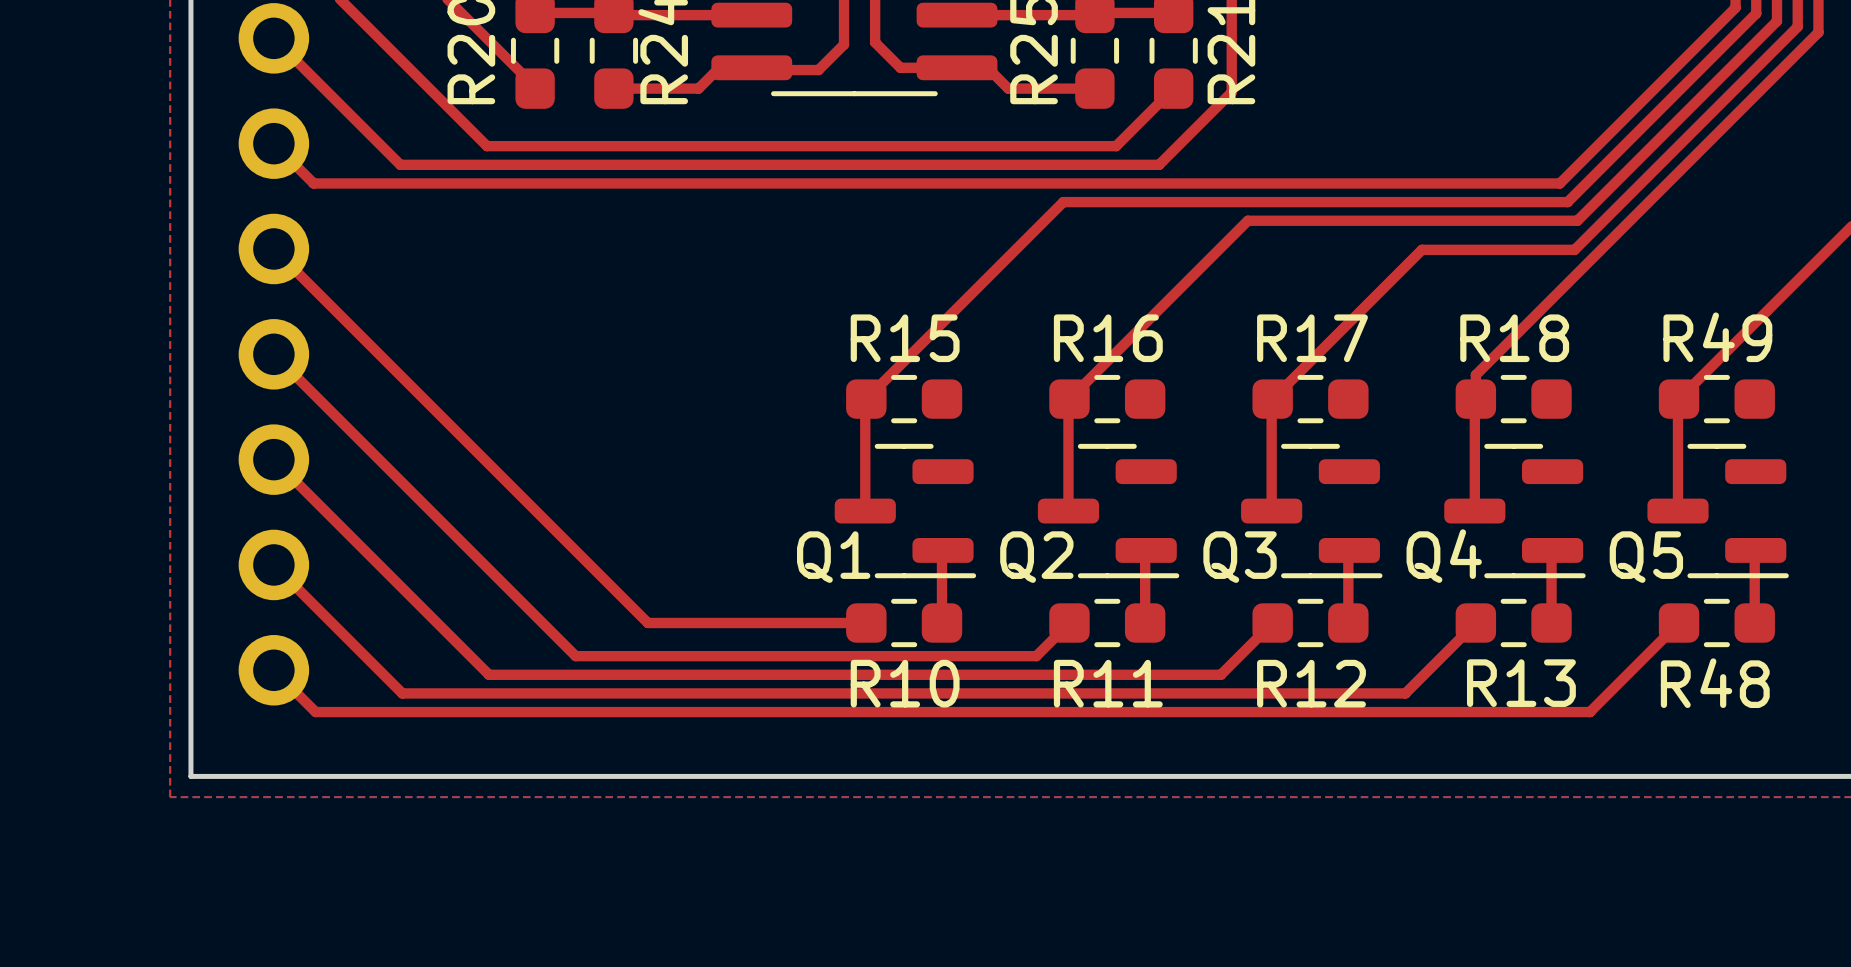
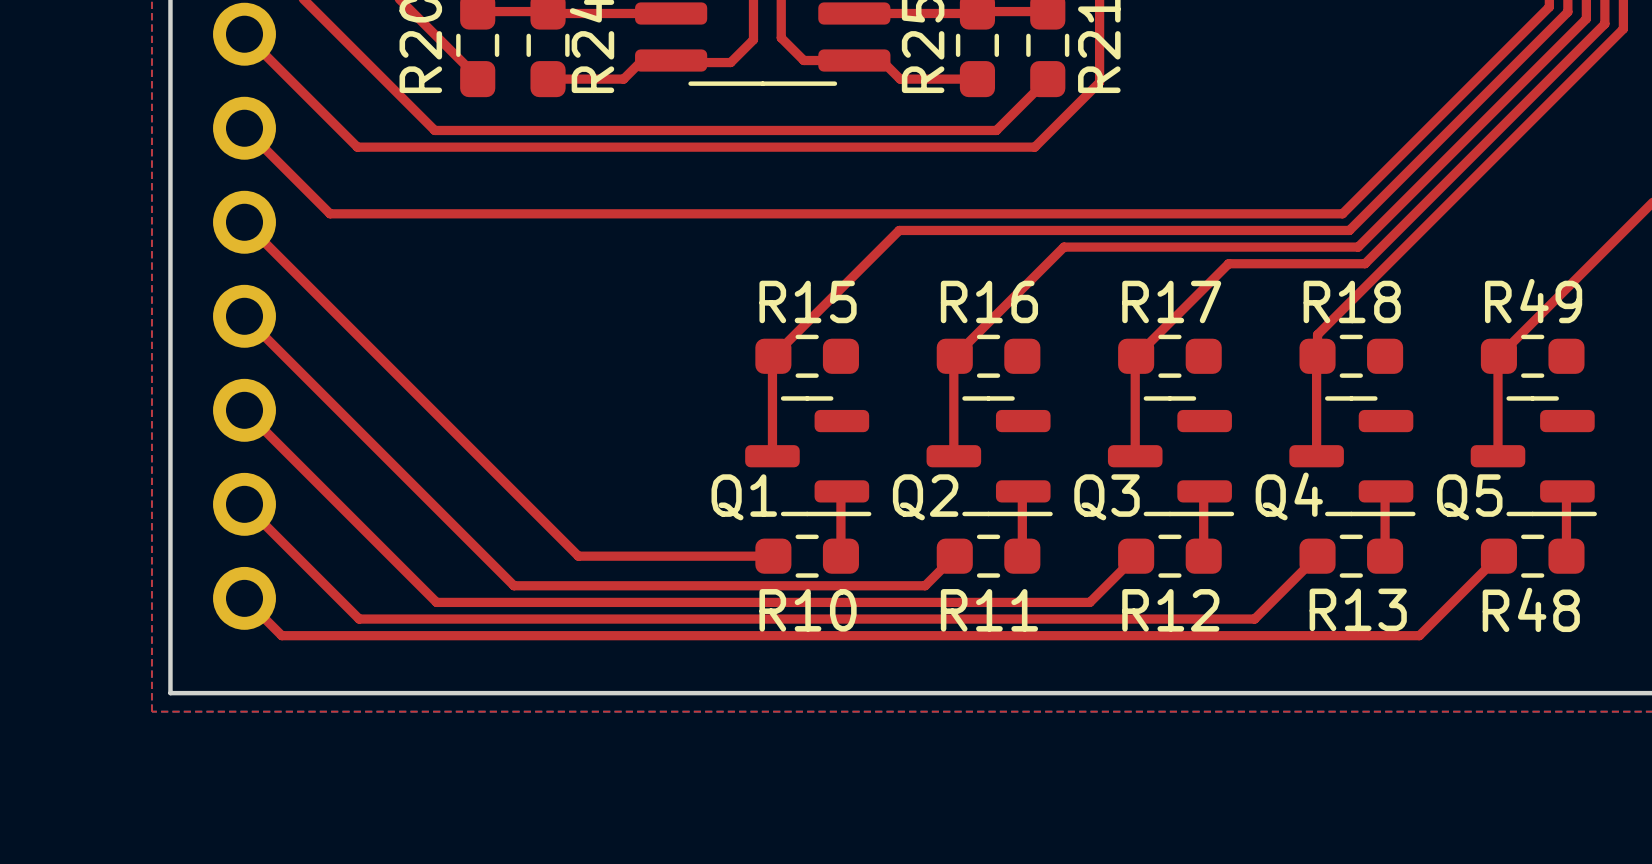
top track: (313, 183) (1559, 183) -> (280, 163) (330, 213) (1342, 213) (1392, 163)
top track: (1567, 202) (1063, 202) (1007, 258) -> (1399, 180) (1349, 230) (899, 230)
top track: (1577, 220) (1247, 220) (1191, 276) -> (1408, 197) (1358, 247) (1063, 247)
top track: (1574, 249) (1421, 249) (1376, 295) -> (1405, 223) (1365, 263) (1228, 263)

